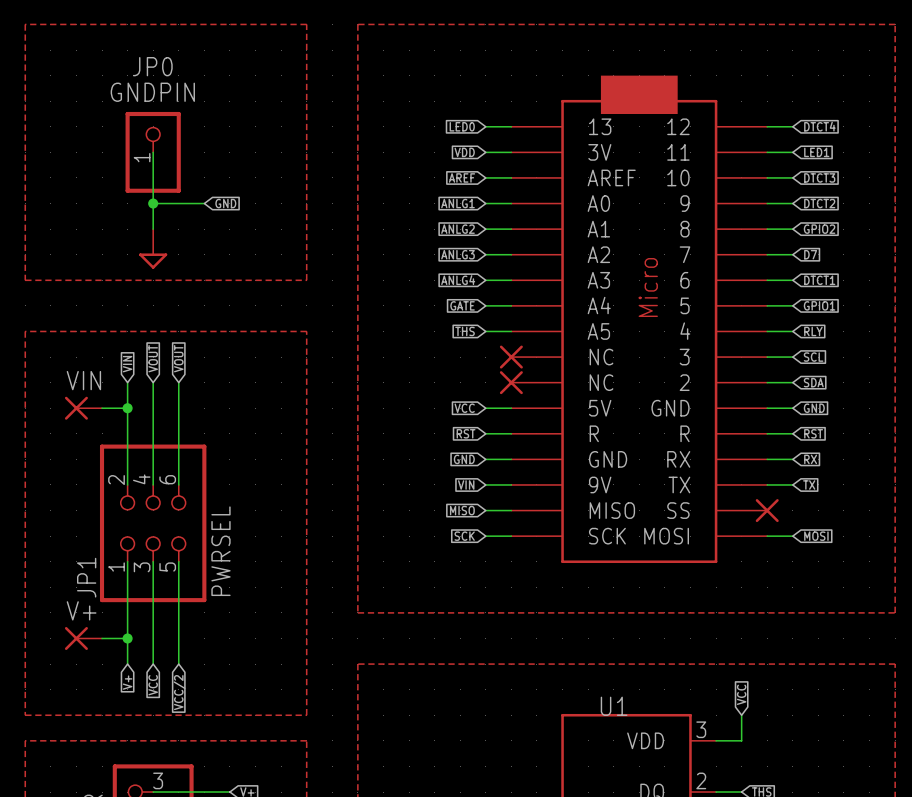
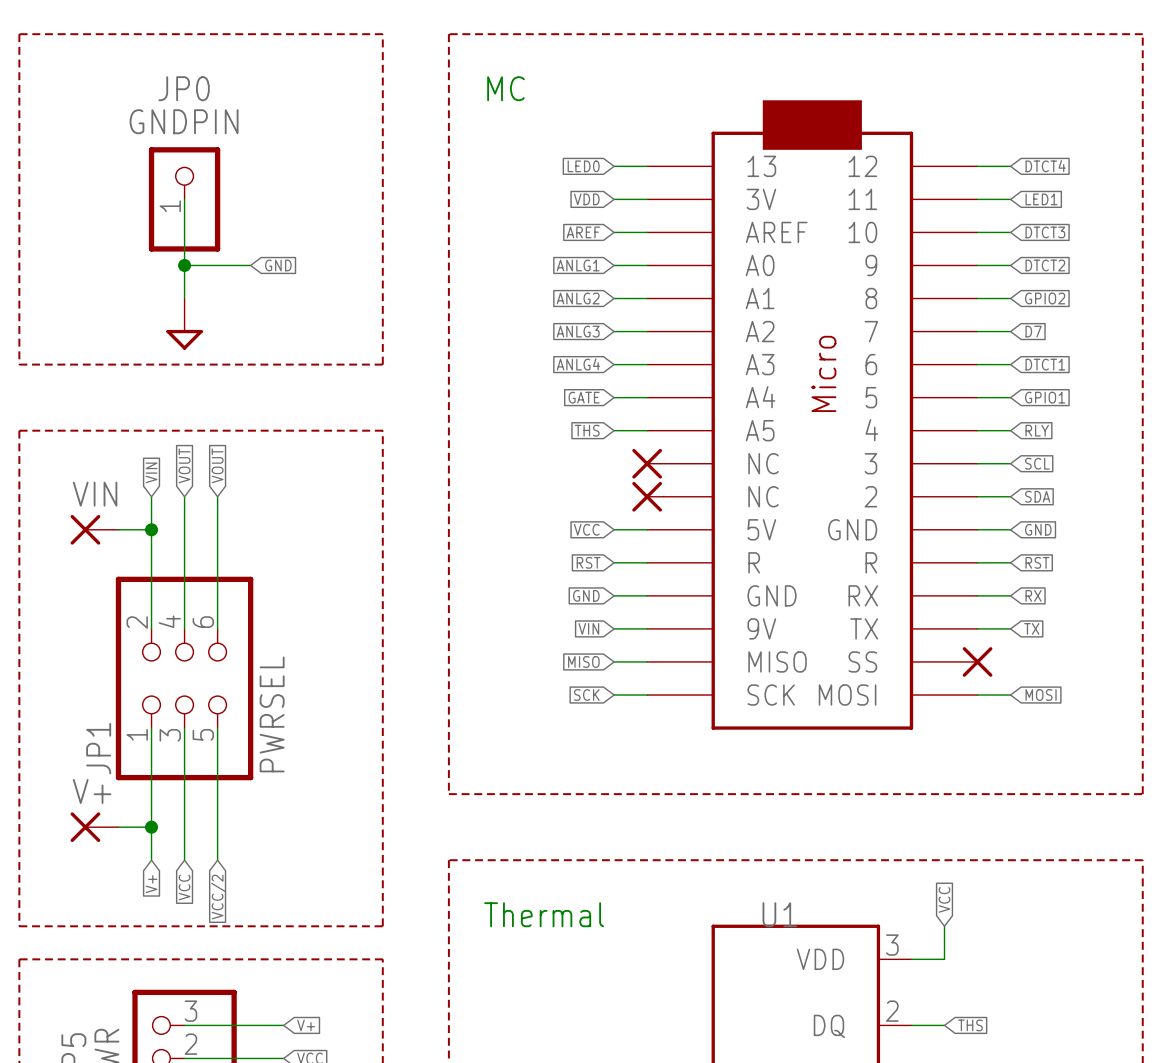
text: none -> MC (505, 88)
text: none -> Thermal (544, 914)

